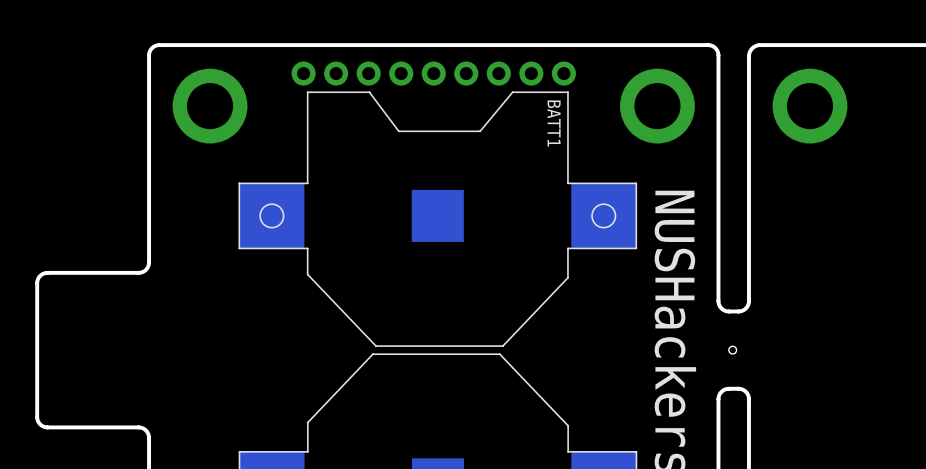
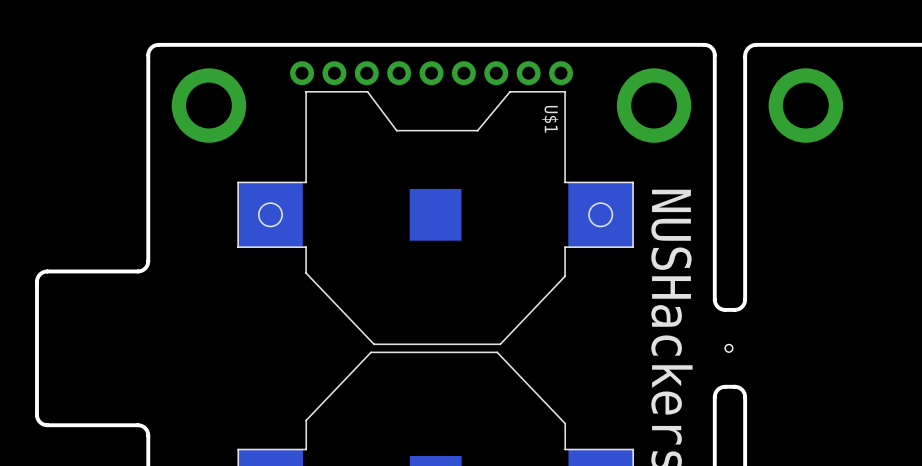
BATT1 name: BATT1 (554, 123) -> U$1 (550, 119)

